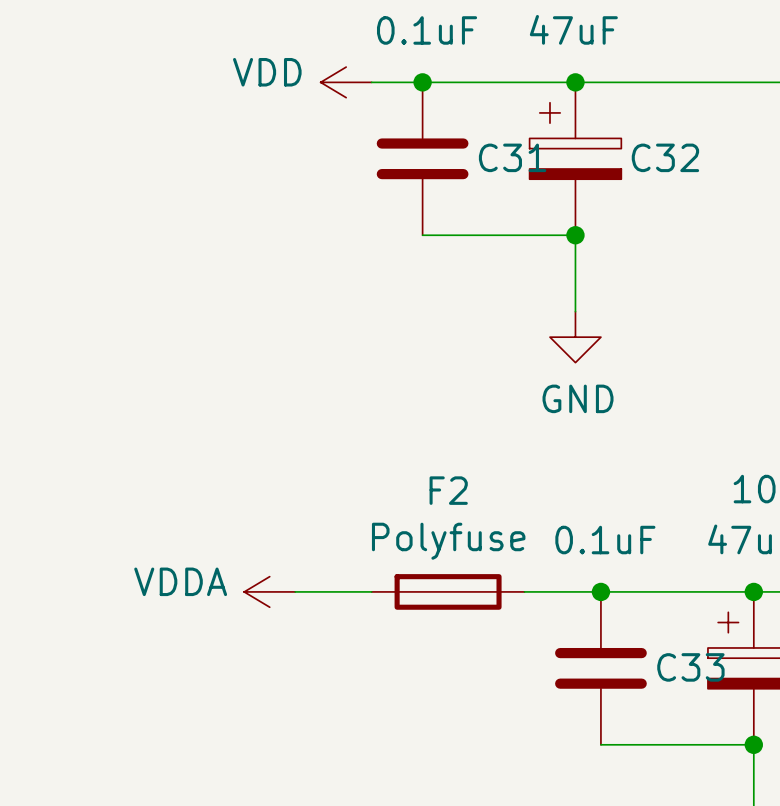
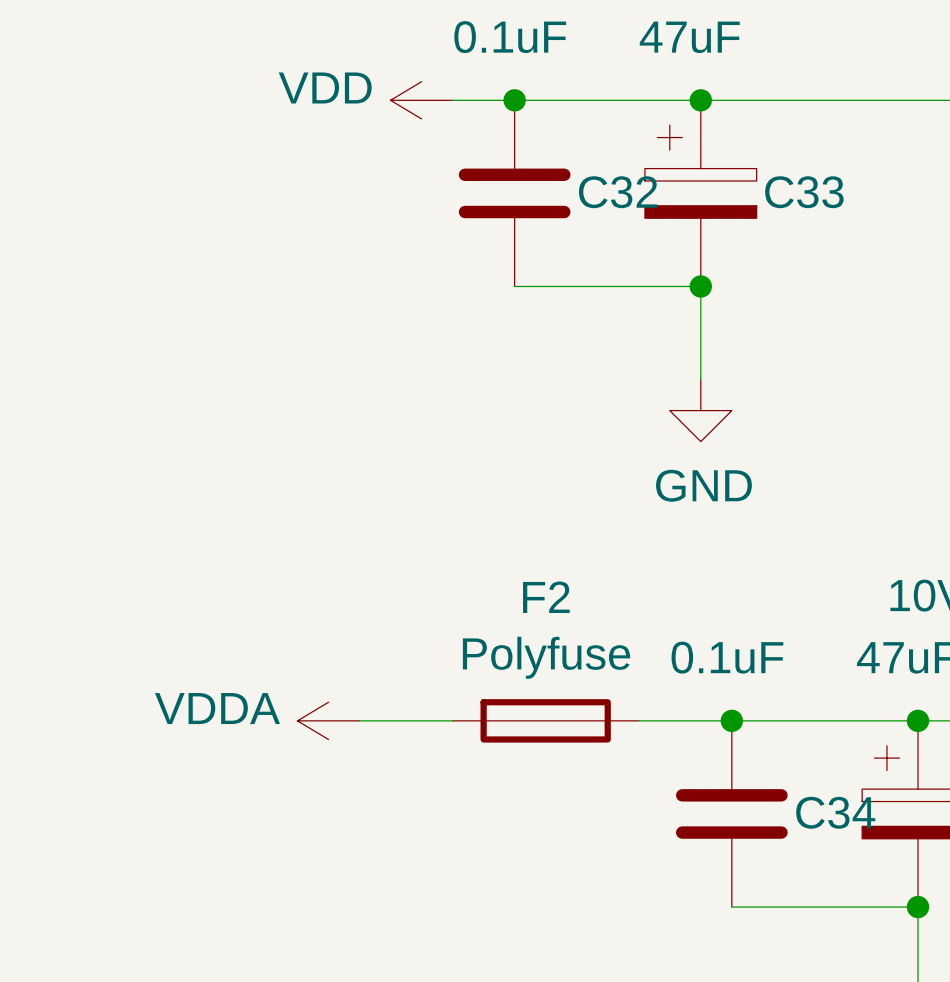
C31 name: C31 (512, 157) -> C32 (618, 192)
C32 name: C32 (665, 157) -> C33 (804, 192)
C33 name: C33 (690, 667) -> C34 (835, 812)

